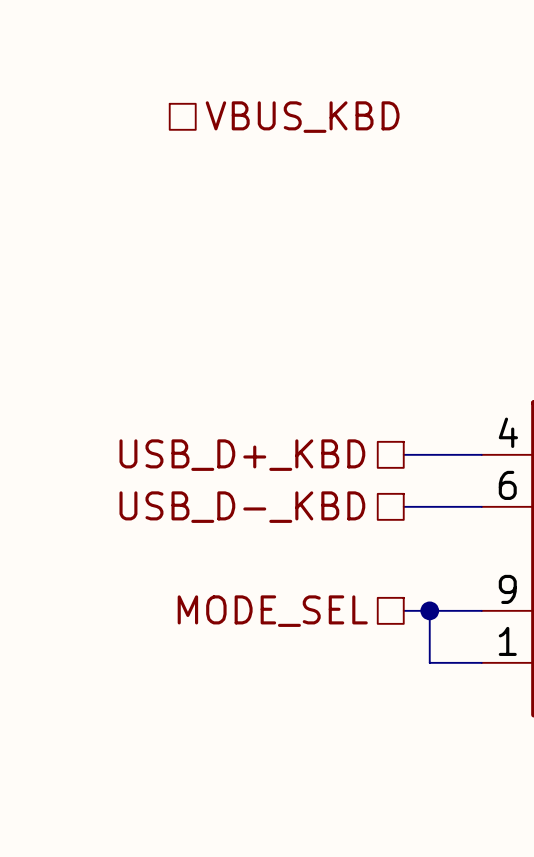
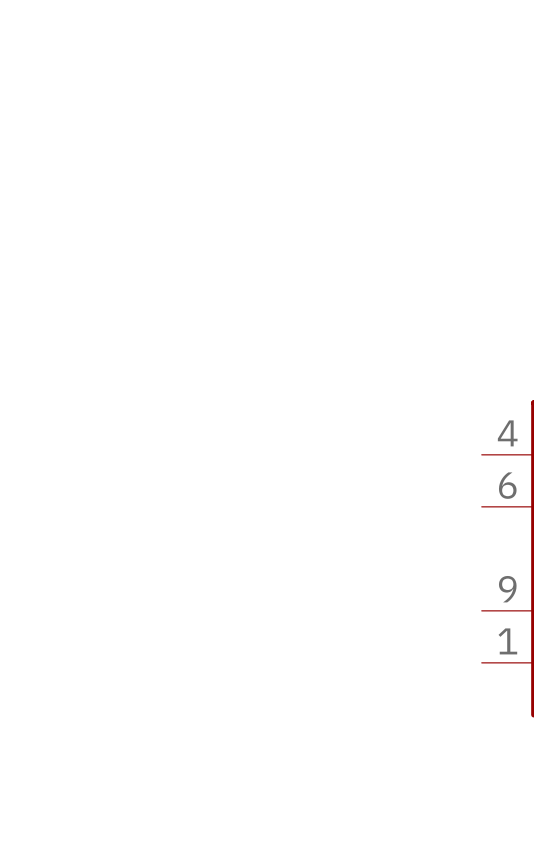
hierarchical label: VBUS_KBD (302, 117) -> none
wire: (403, 454) (481, 454) -> none
hierarchical label: USB_D+_KBD (242, 455) -> none
wire: (403, 506) (481, 506) -> none
hierarchical label: USB_D-_KBD (242, 507) -> none
wire: (403, 610) (481, 610) -> none
wire: (429, 610) (429, 662) (481, 662) -> none
junction: (429, 610) -> none
hierarchical label: MODE_SEL (272, 611) -> none

